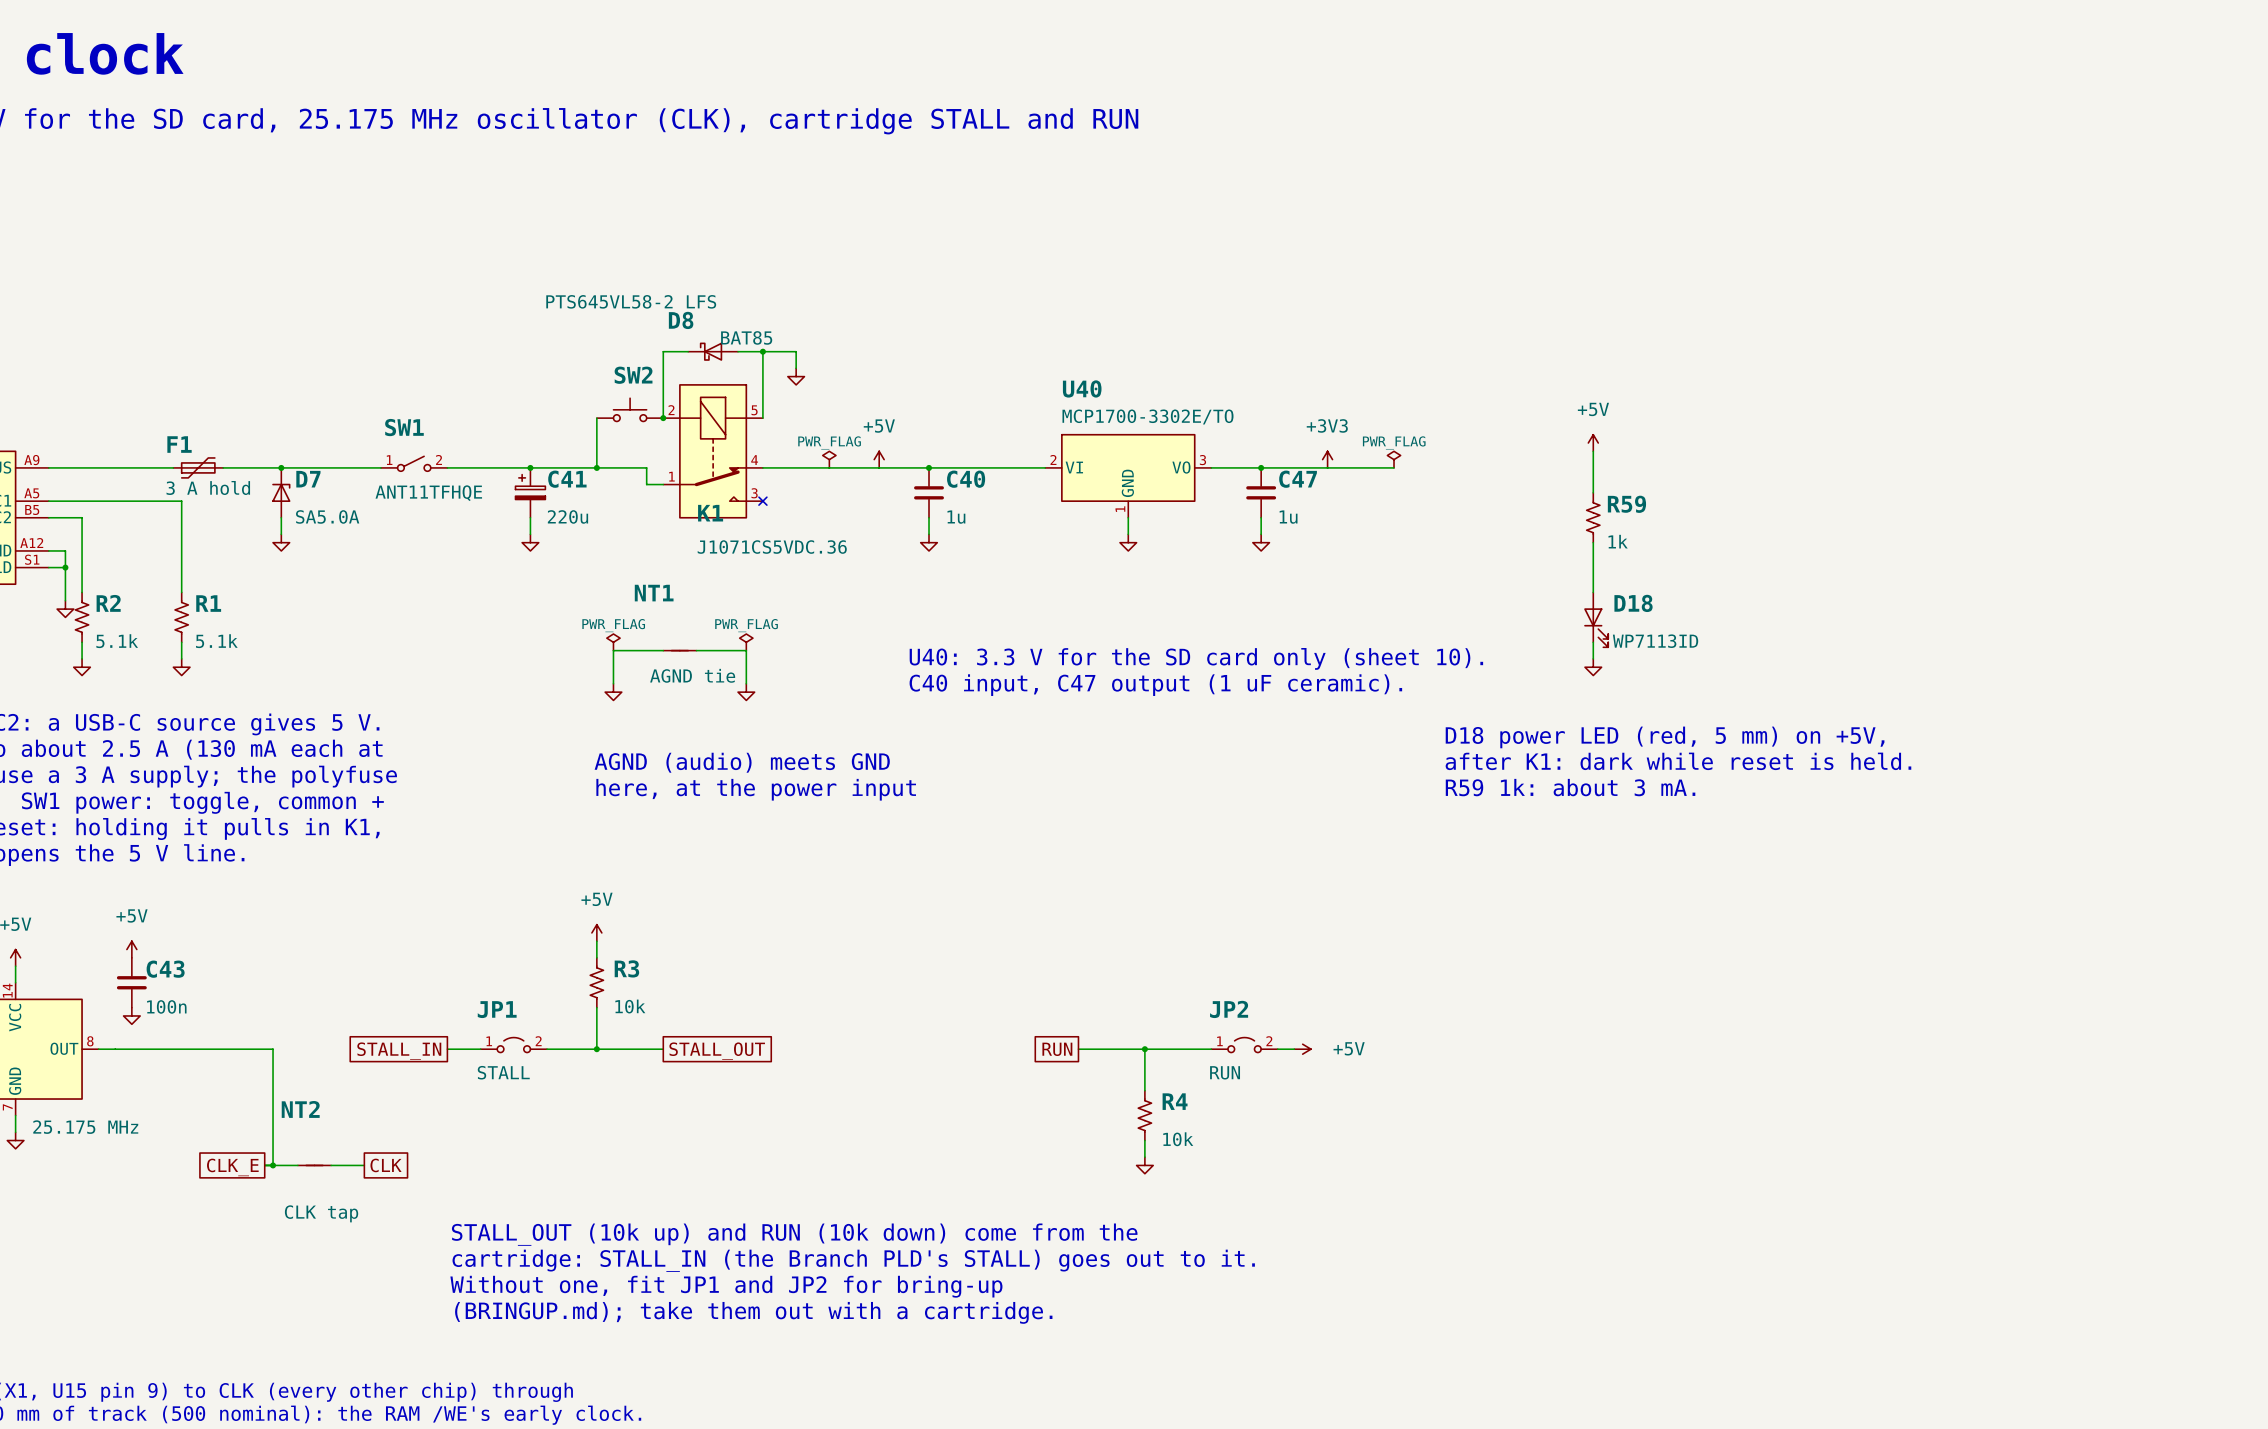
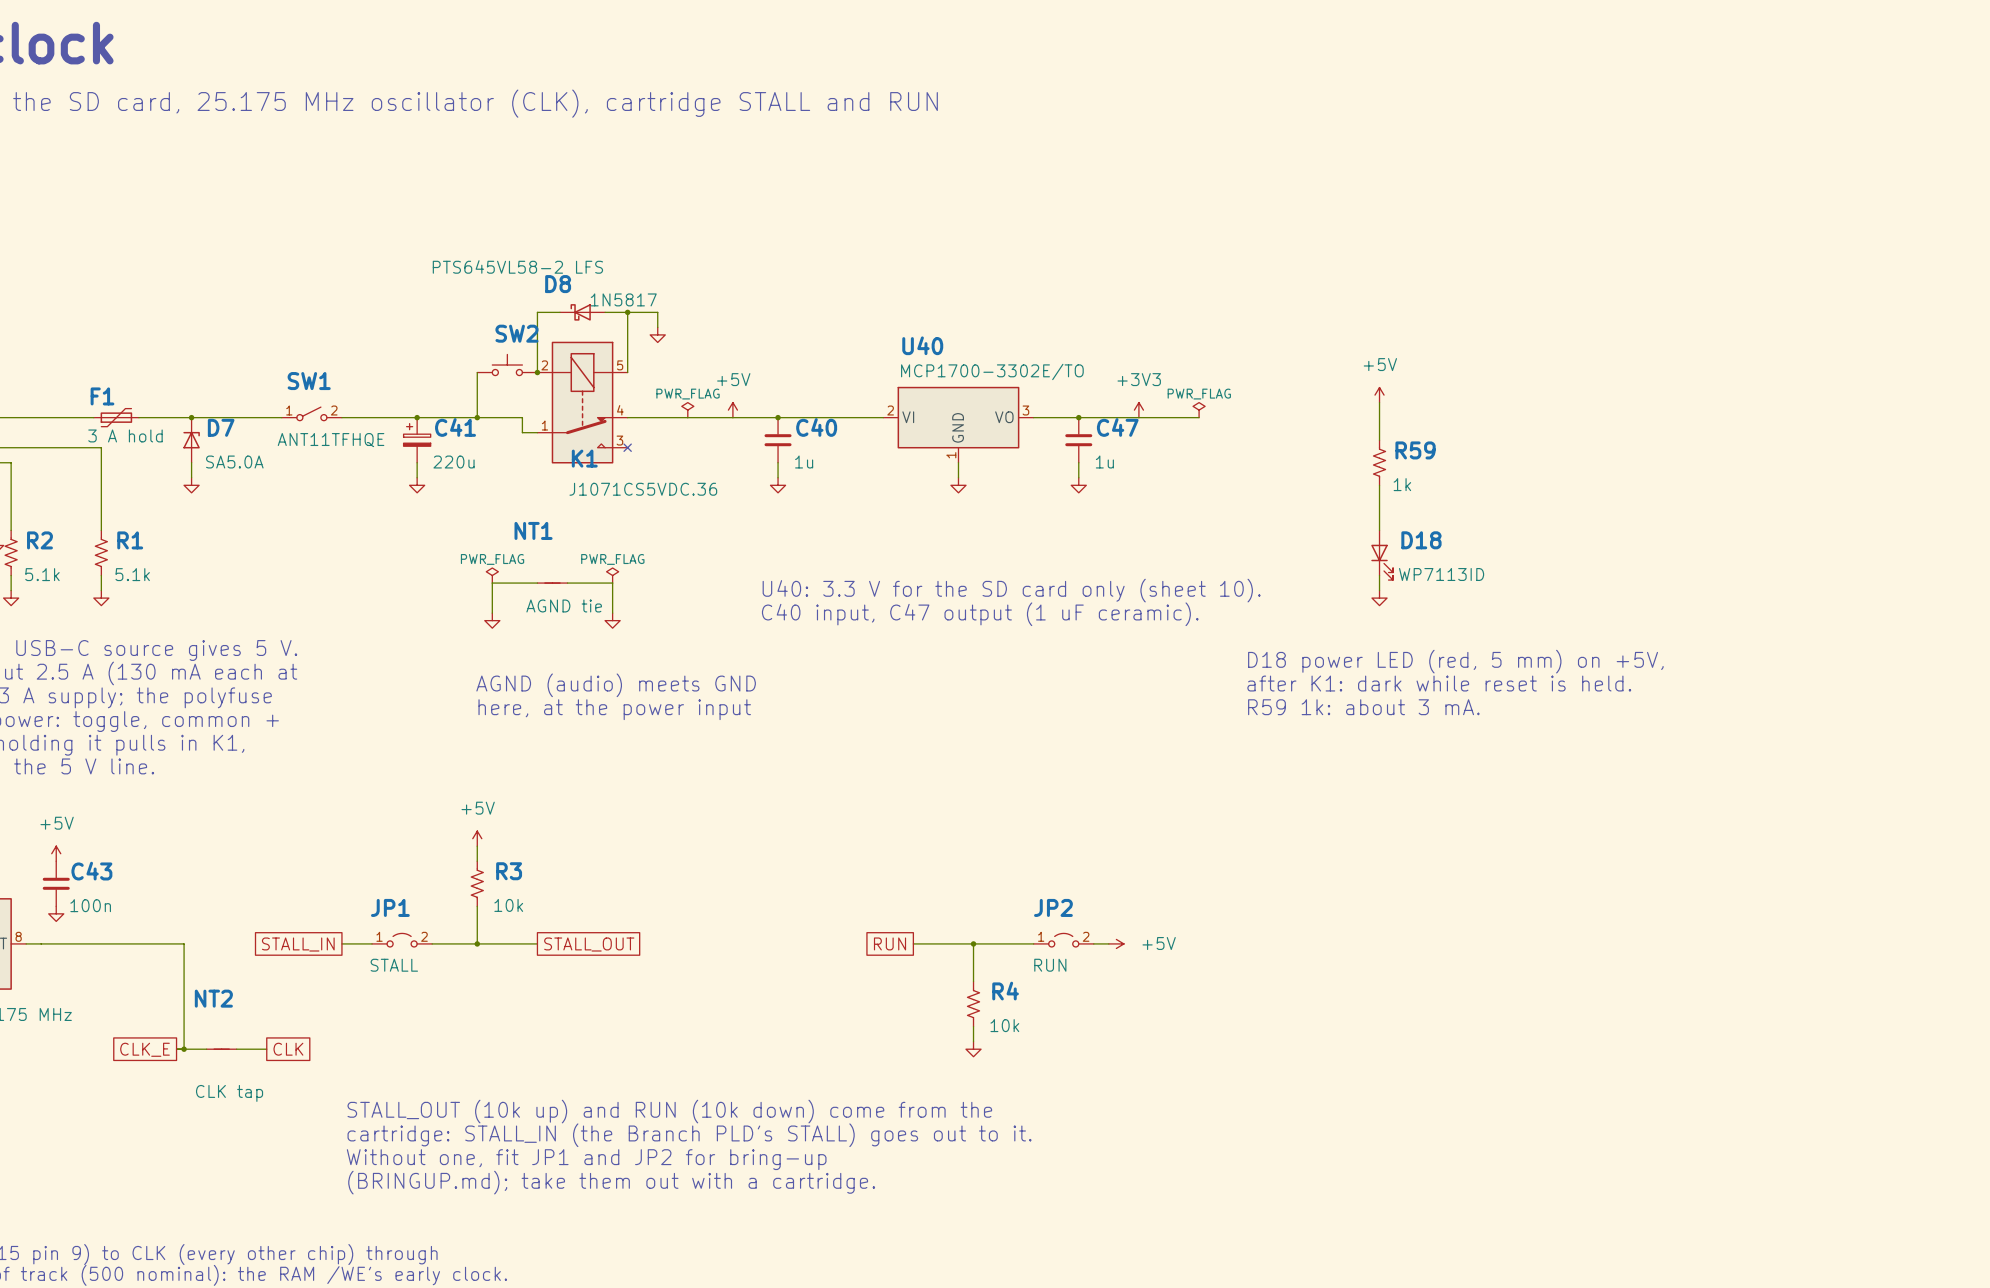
D8 value: BAT85 (746, 337) -> 1N5817 (623, 299)

